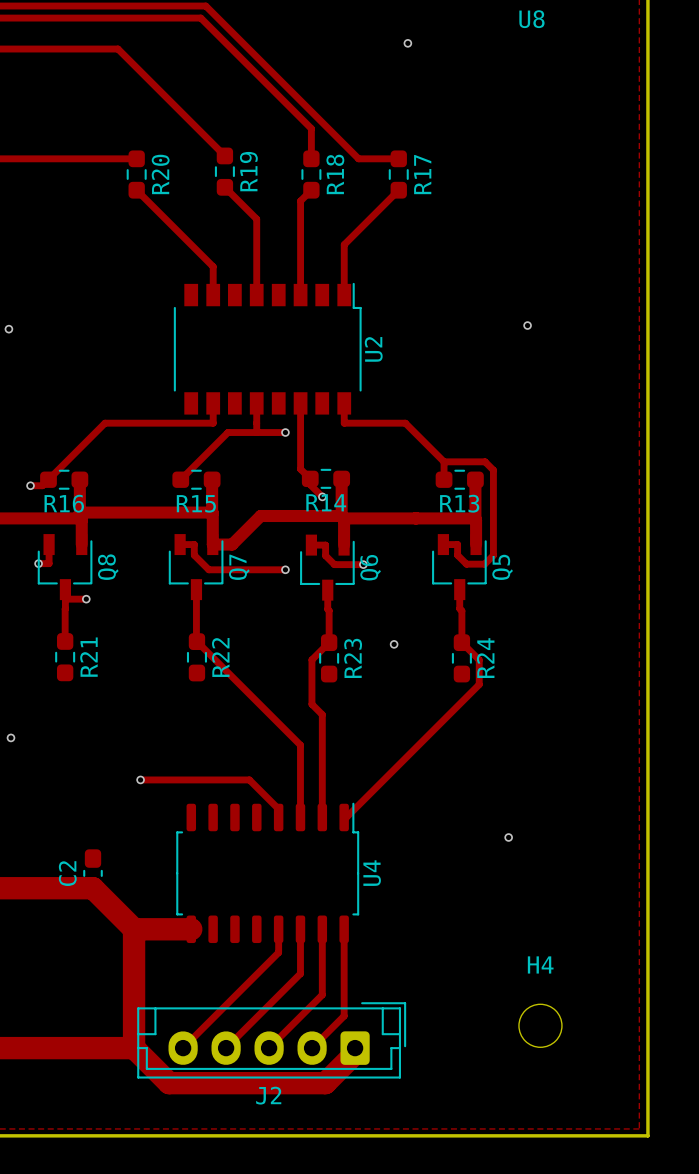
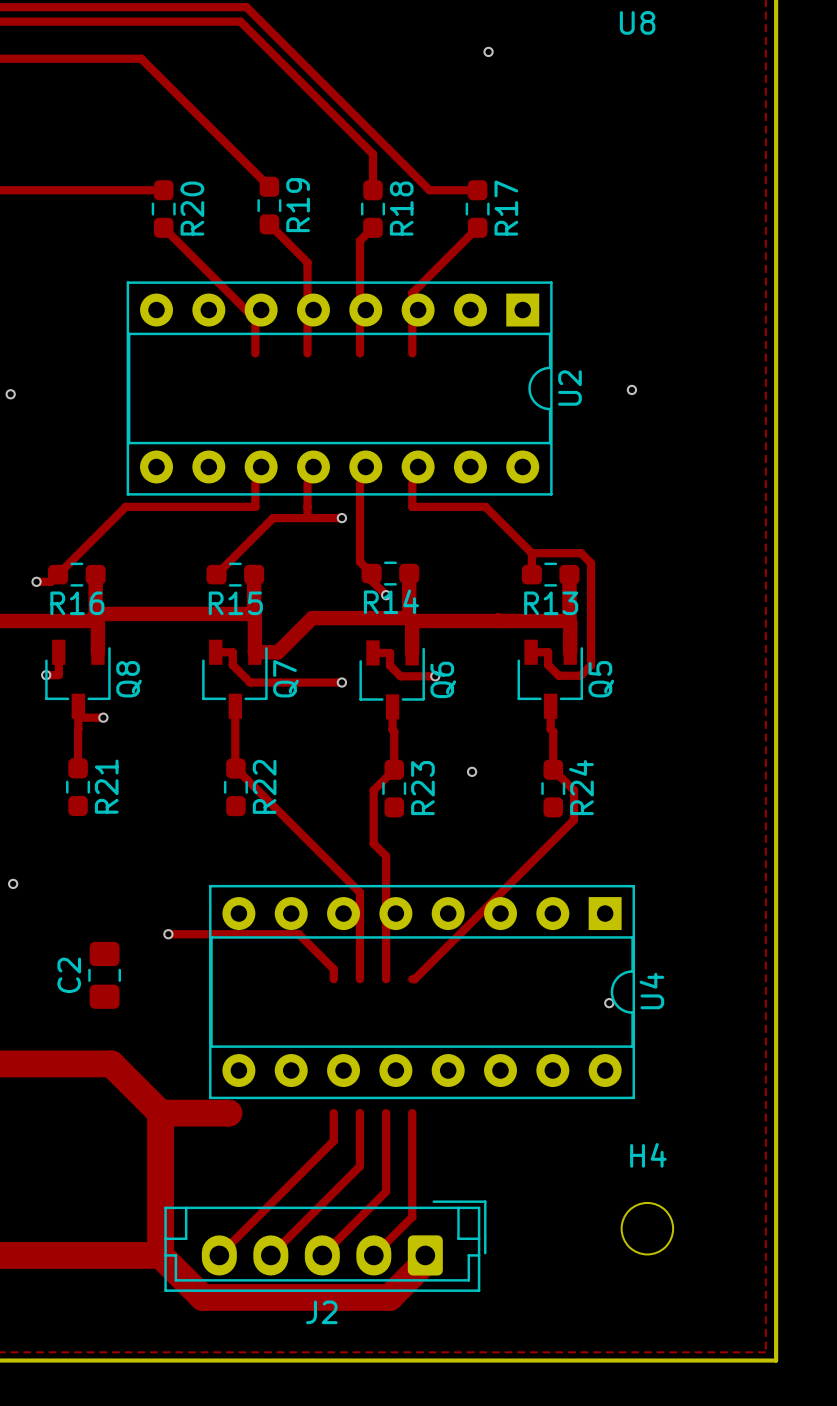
U2 footprint: [173, 282, 362, 415] -> [126, 281, 553, 496]
U2 name position: U2 (373, 349) -> U2 (569, 388)
U4 footprint: [176, 802, 360, 944] -> [209, 884, 636, 1100]
C2 footprint: [83, 849, 103, 898] -> [88, 941, 121, 1009]
U4 name position: U4 (372, 873) -> U4 (651, 991)

